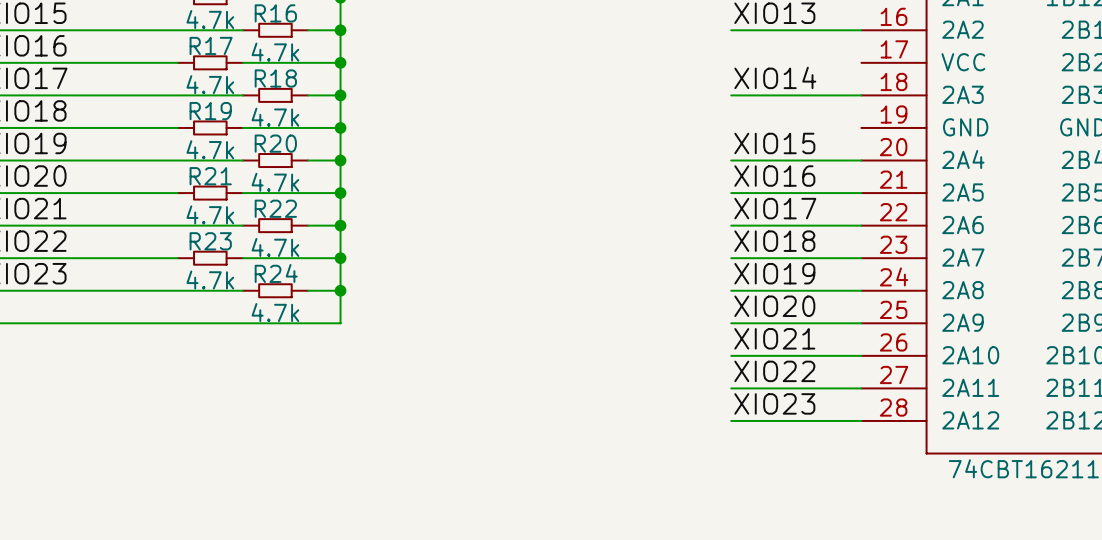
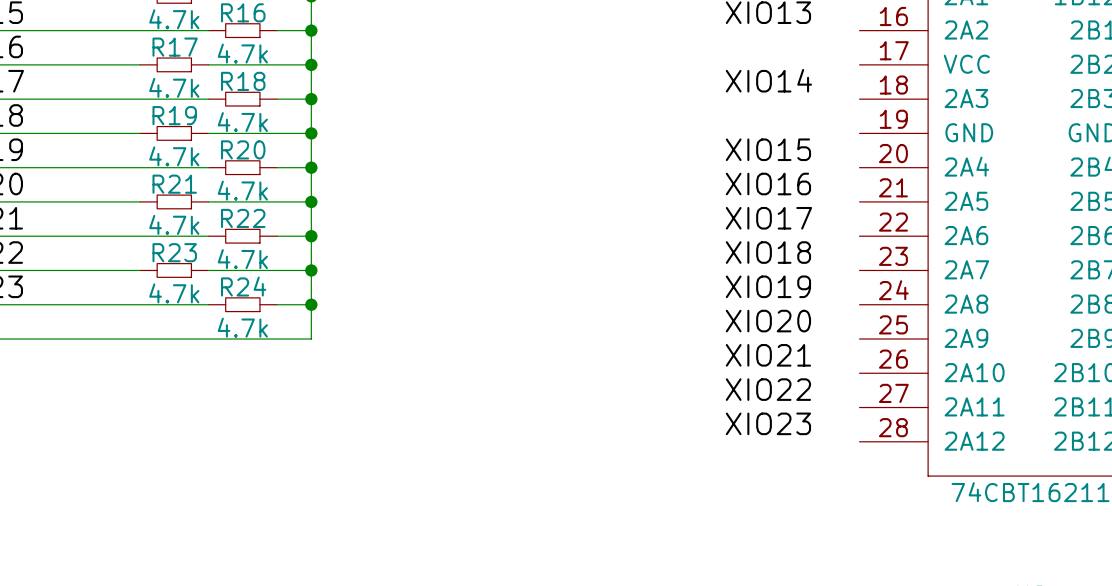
wire: (731, 30) (861, 30) -> none
wire: (731, 95) (861, 95) -> none
wire: (731, 160) (861, 160) -> none
wire: (731, 193) (861, 193) -> none
wire: (731, 225) (861, 225) -> none
wire: (731, 258) (861, 258) -> none
wire: (731, 290) (861, 290) -> none
wire: (731, 323) (861, 323) -> none
wire: (731, 355) (861, 355) -> none
wire: (731, 388) (861, 388) -> none
wire: (731, 420) (861, 420) -> none

